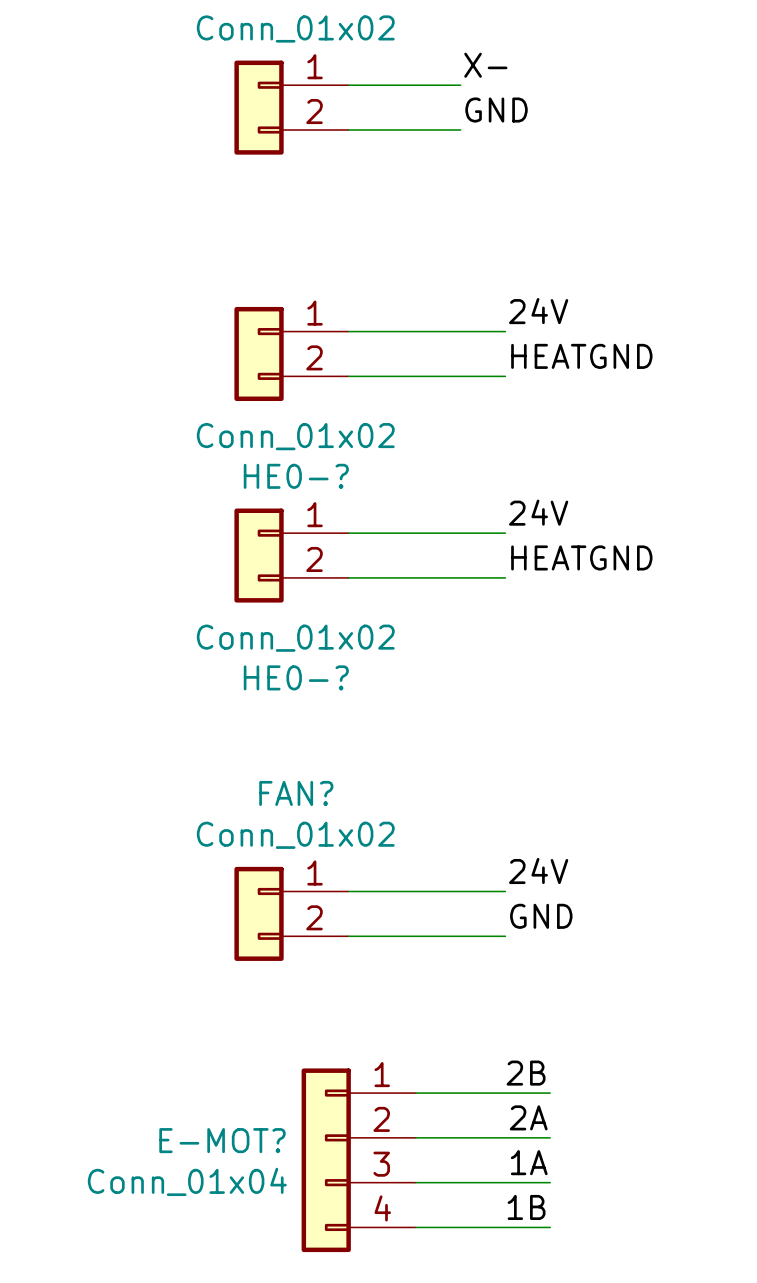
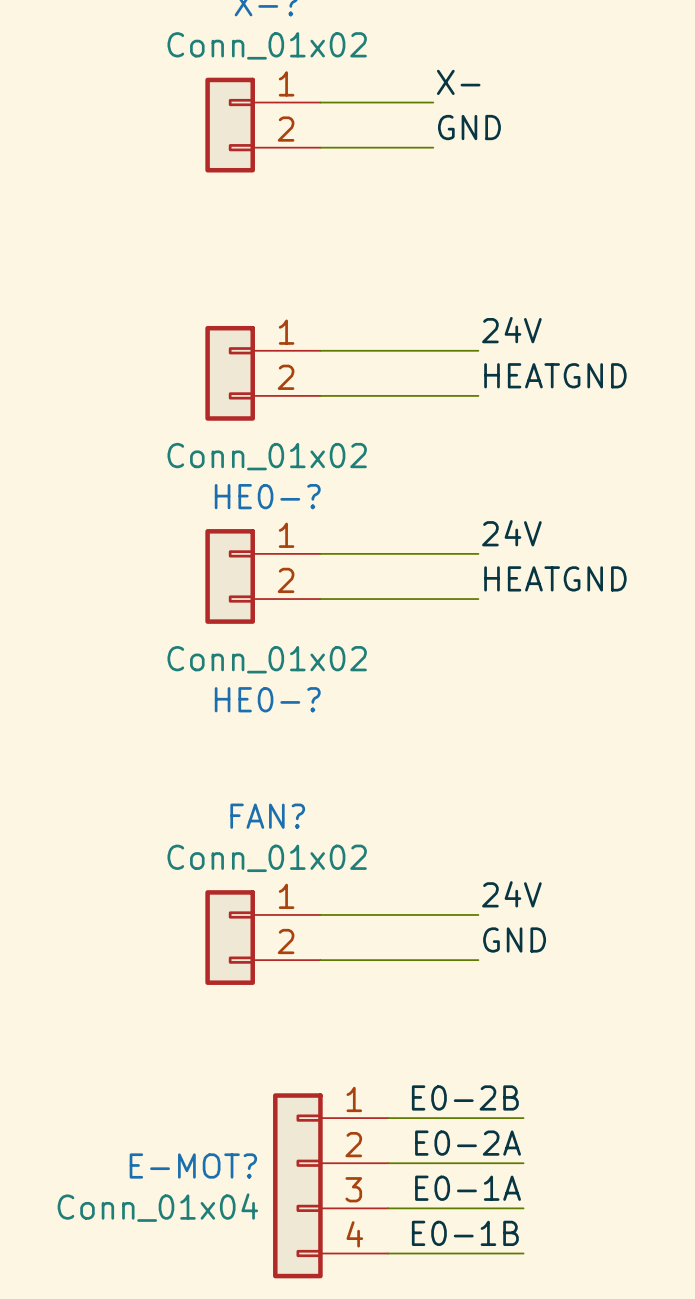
label: 2B (526, 1073) -> E0-2B (465, 1097)
label: 2A (528, 1117) -> E0-2A (468, 1143)
label: 1A (529, 1162) -> E0-1A (468, 1188)
label: 1B (526, 1207) -> E0-1B (465, 1233)

